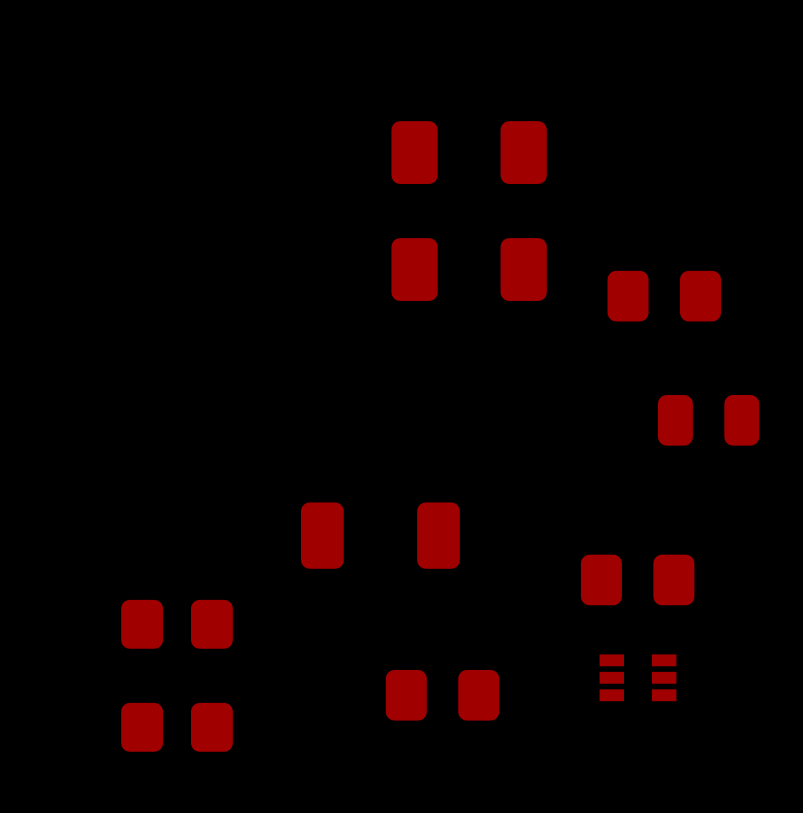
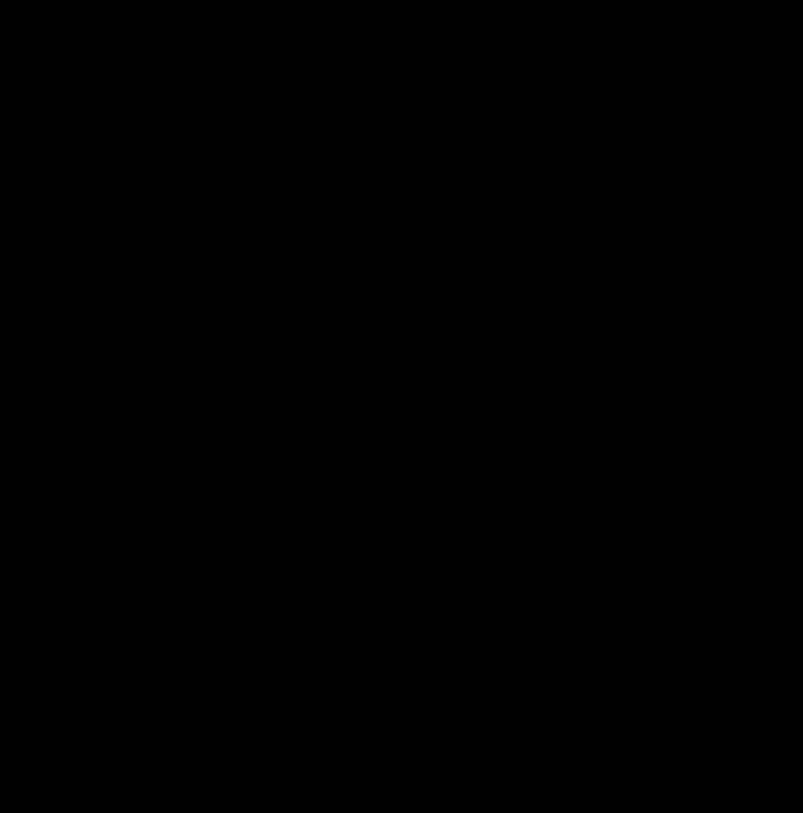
part: (469, 152) -> none
part: (469, 269) -> none
part: (664, 296) -> none
part: (708, 420) -> none
part: (380, 535) -> none
part: (637, 579) -> none
part: (177, 624) -> none
part: (637, 677) -> none
part: (442, 695) -> none
part: (177, 727) -> none

